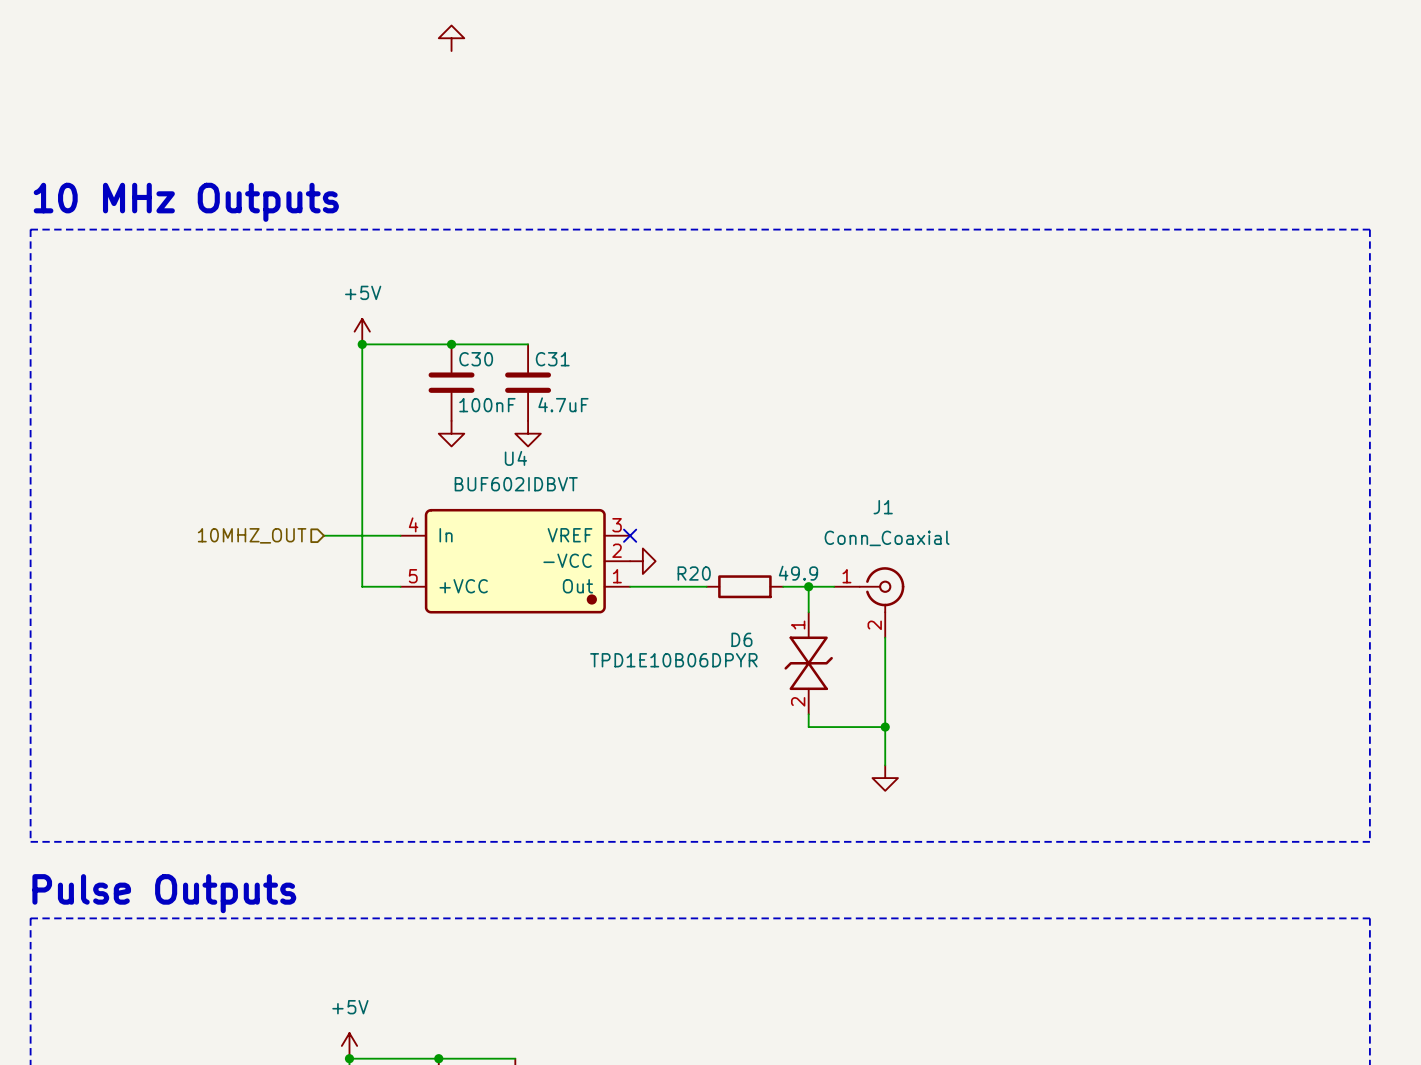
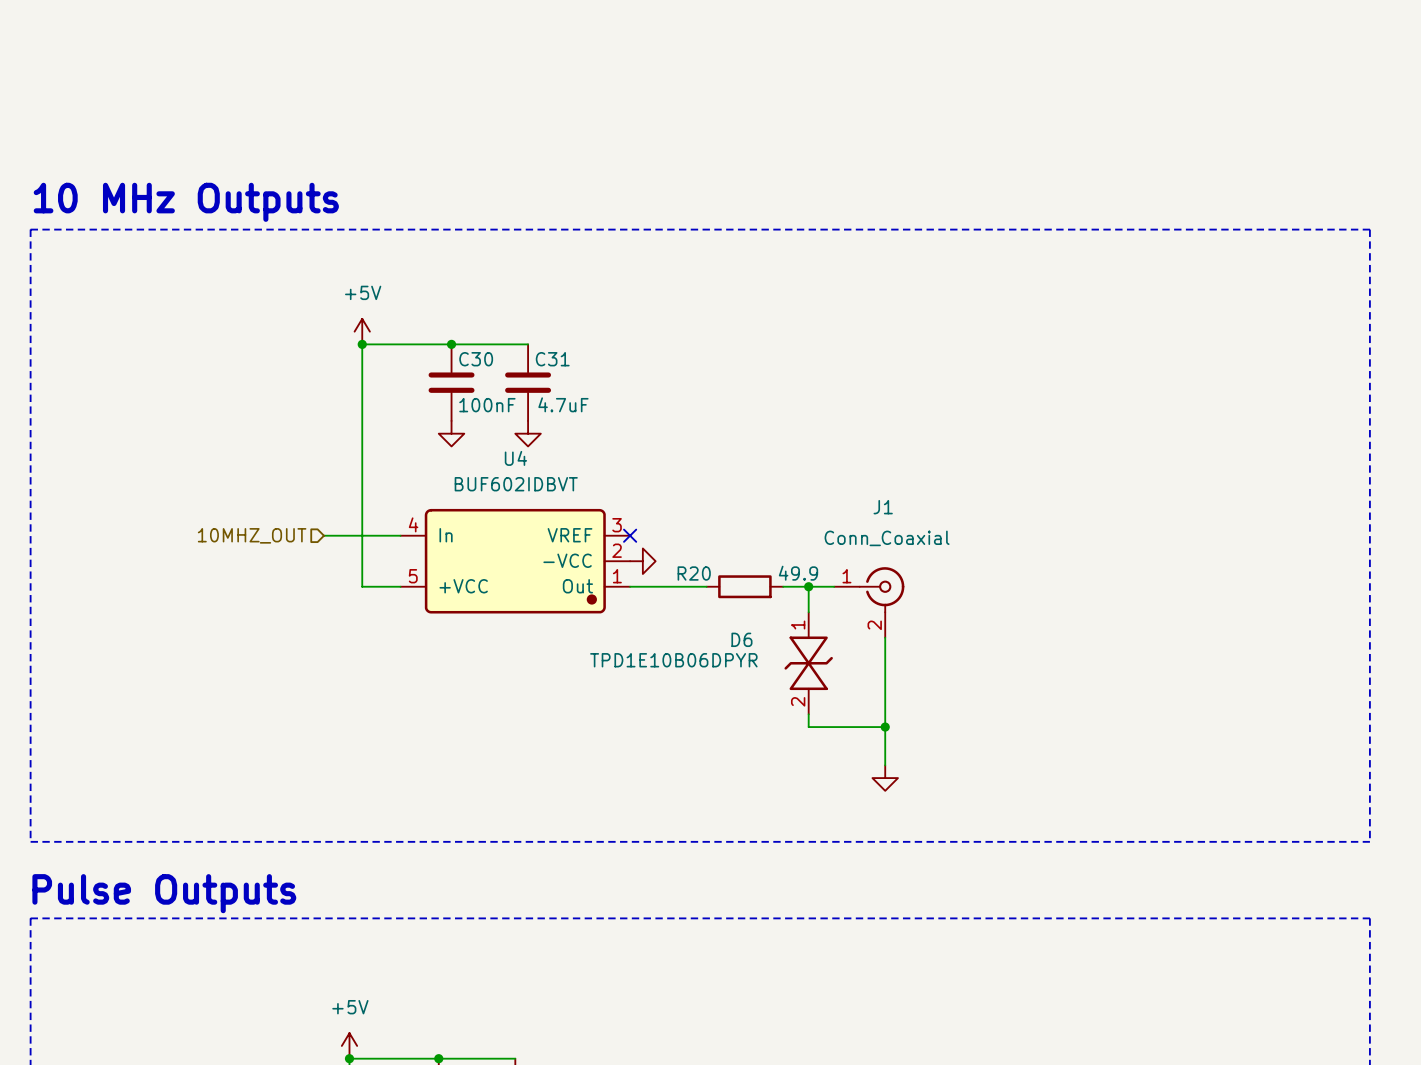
power symbol: (451, 38) -> none

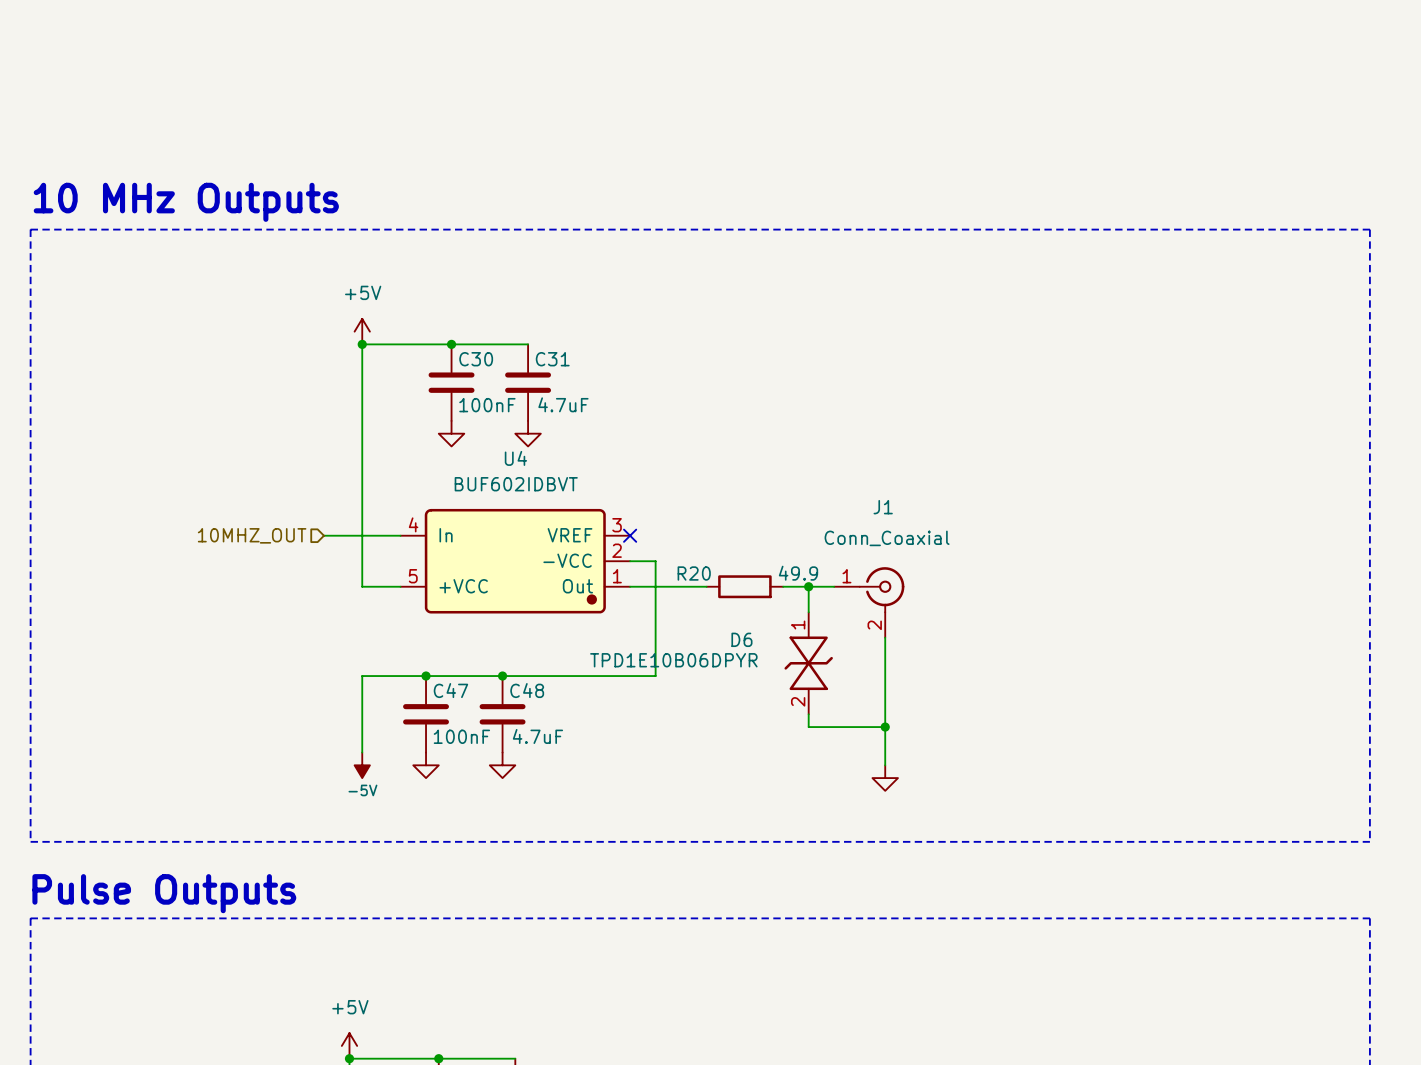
wire: none -> (630, 561) (655, 561) (655, 676) (362, 676) (362, 752)
power symbol: (642, 561) -> none
junction: none -> (426, 676)
junction: none -> (502, 676)
C47: none -> 100nF (426, 714)
C48: none -> 4.7uF (502, 714)
power symbol: none -> -5V (362, 765)
power symbol: none -> (426, 765)
power symbol: none -> (502, 765)

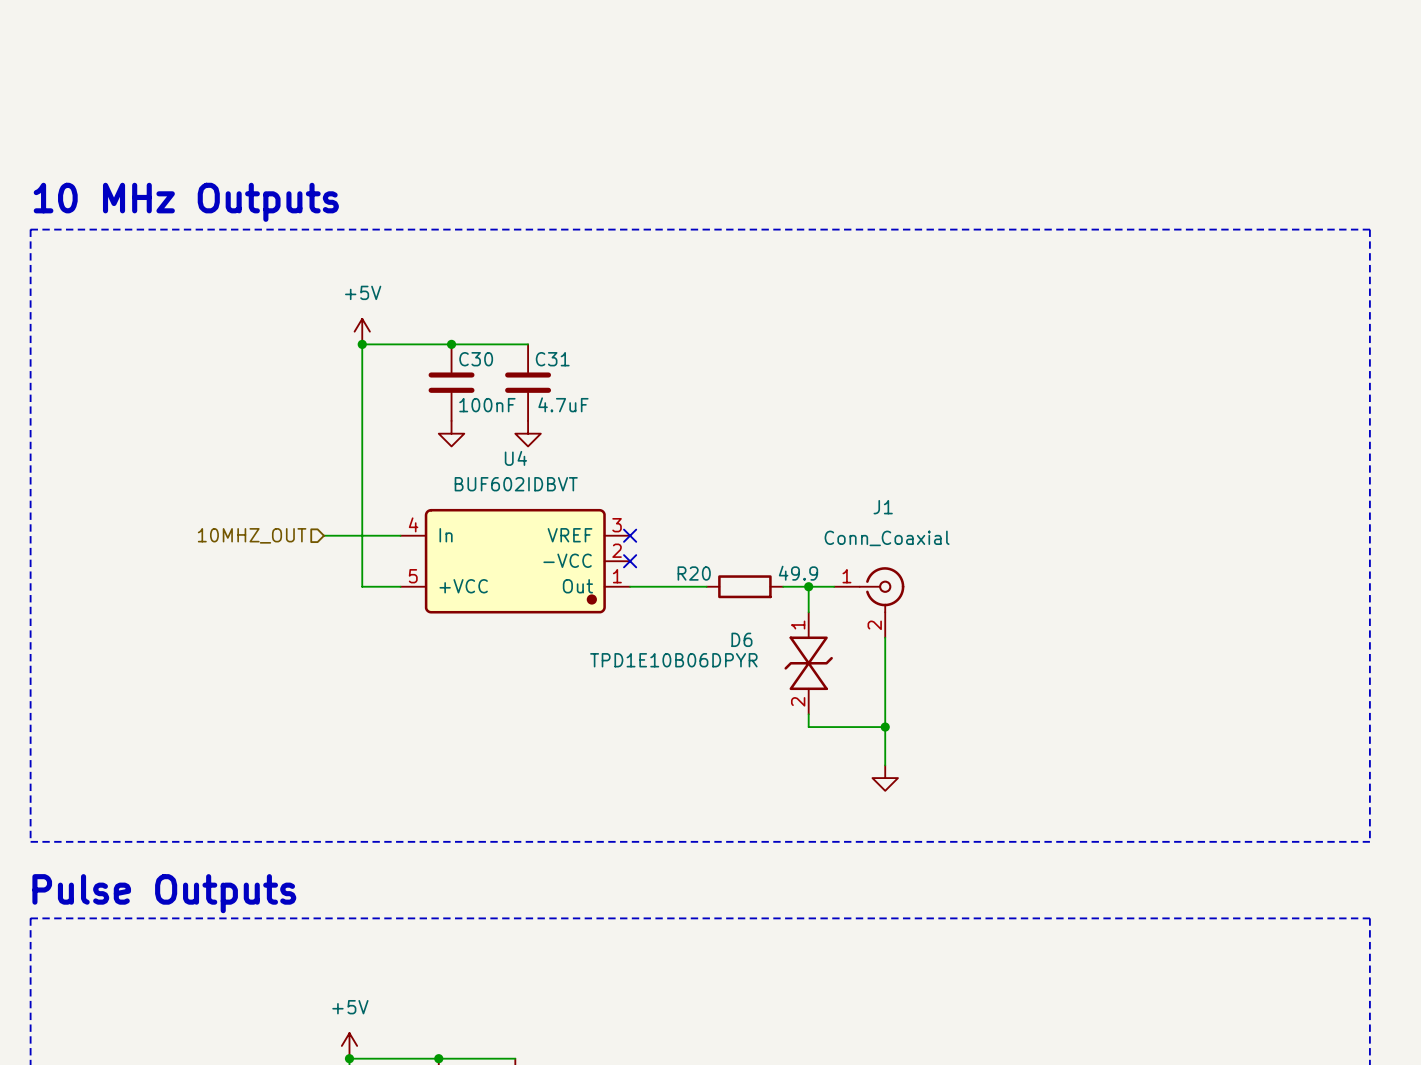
wire: (630, 561) (655, 561) (655, 676) (362, 676) (362, 752) -> none
no-connect mark: none -> (630, 561)
junction: (426, 676) -> none
junction: (502, 676) -> none
C47: 100nF (426, 714) -> none
C48: 4.7uF (502, 714) -> none
power symbol: -5V (362, 765) -> none
power symbol: (426, 765) -> none
power symbol: (502, 765) -> none

